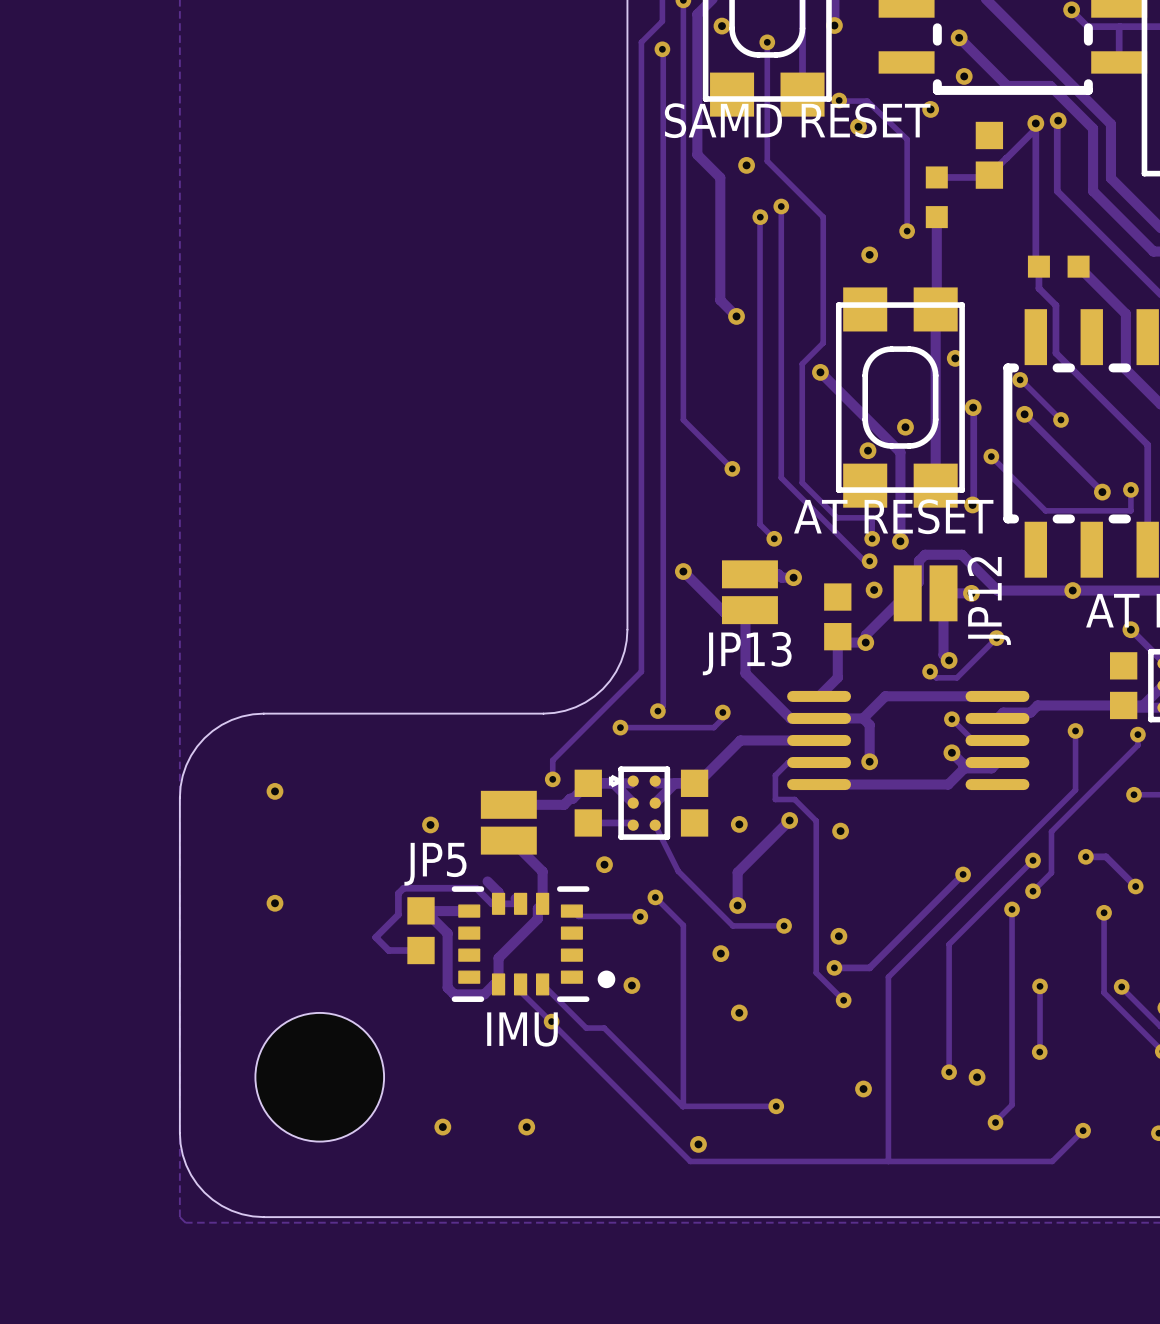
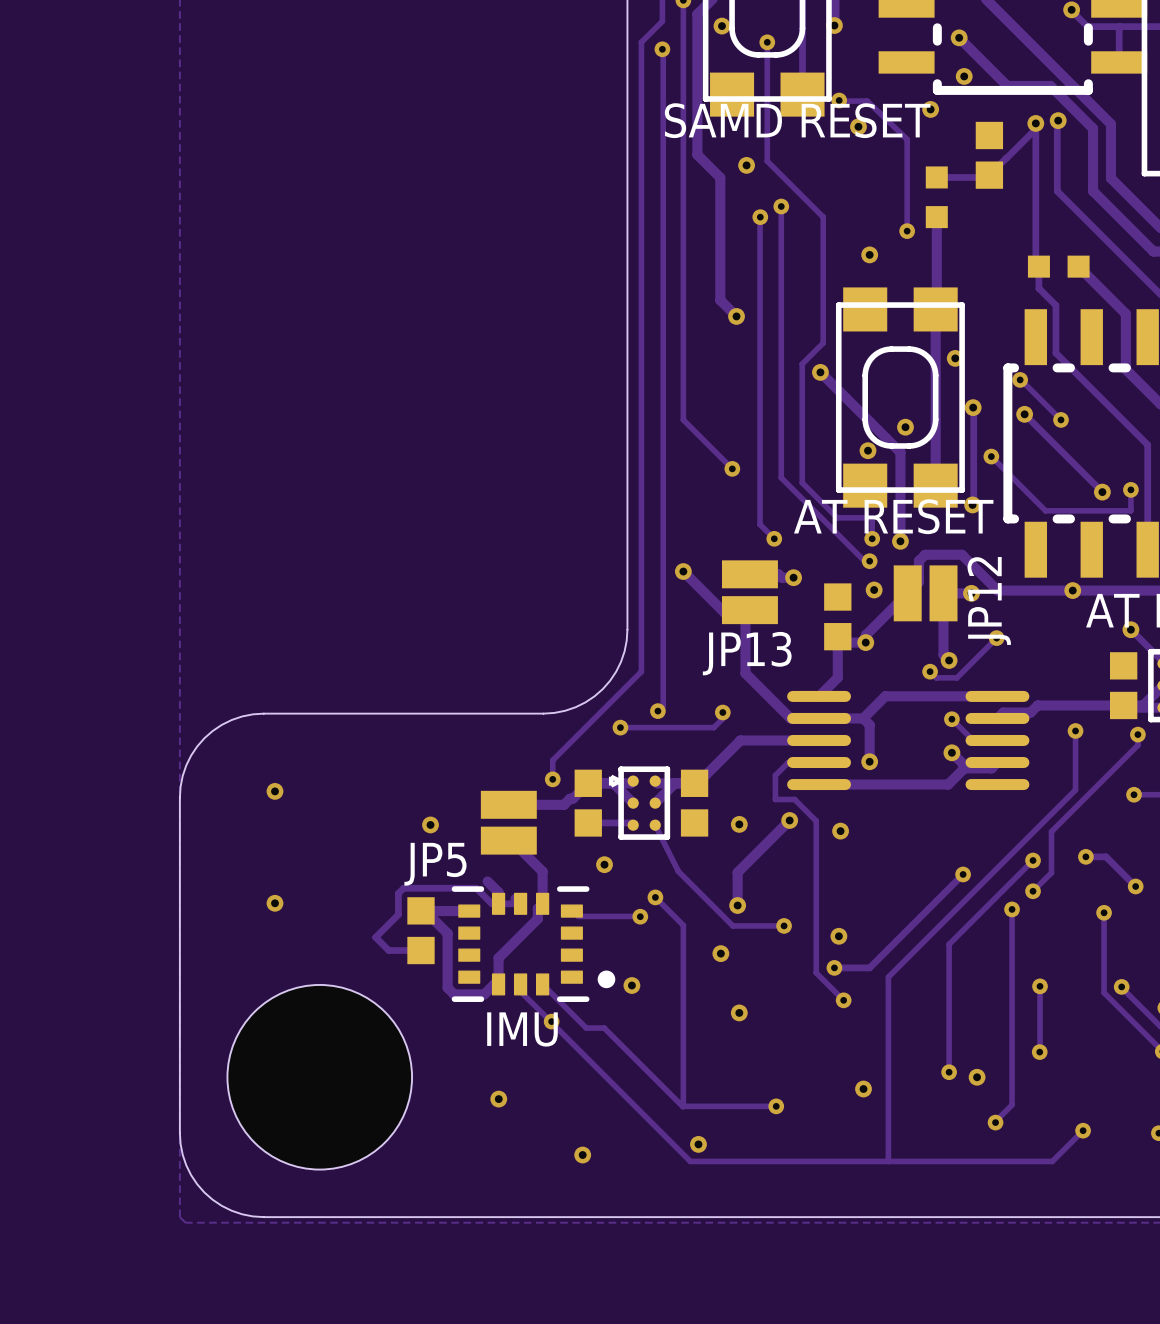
hole size: [255, 1012, 385, 1142] -> [227, 984, 413, 1170]
via: none -> (498, 1099)
via: (442, 1127) -> none
via: (526, 1127) -> none
via: none -> (582, 1155)

